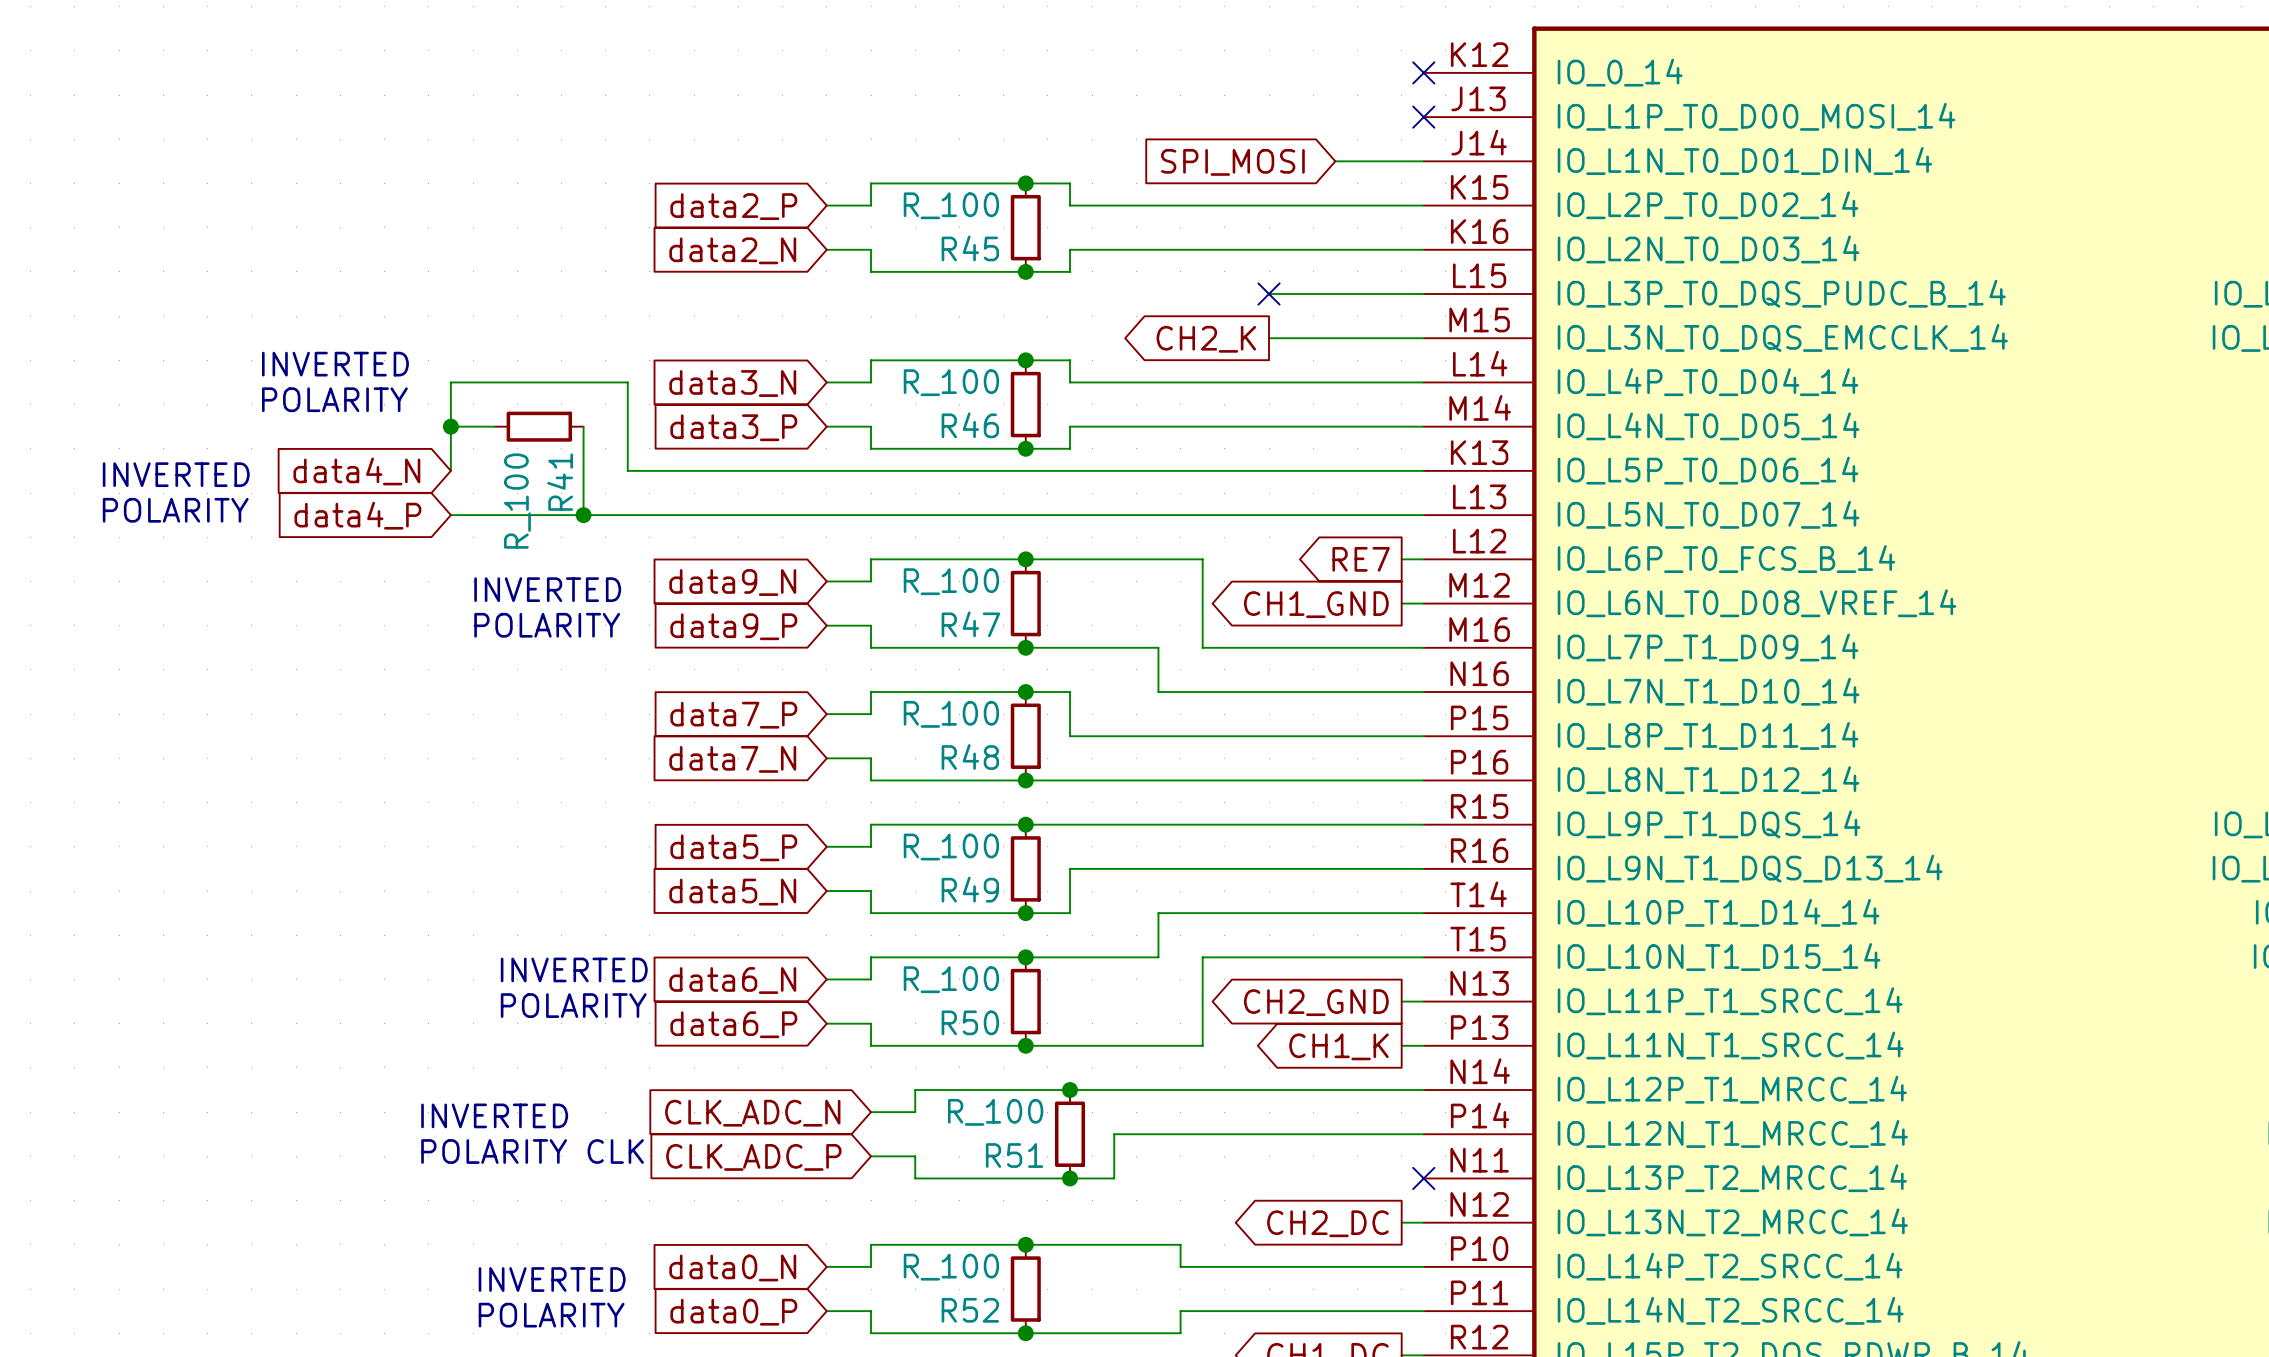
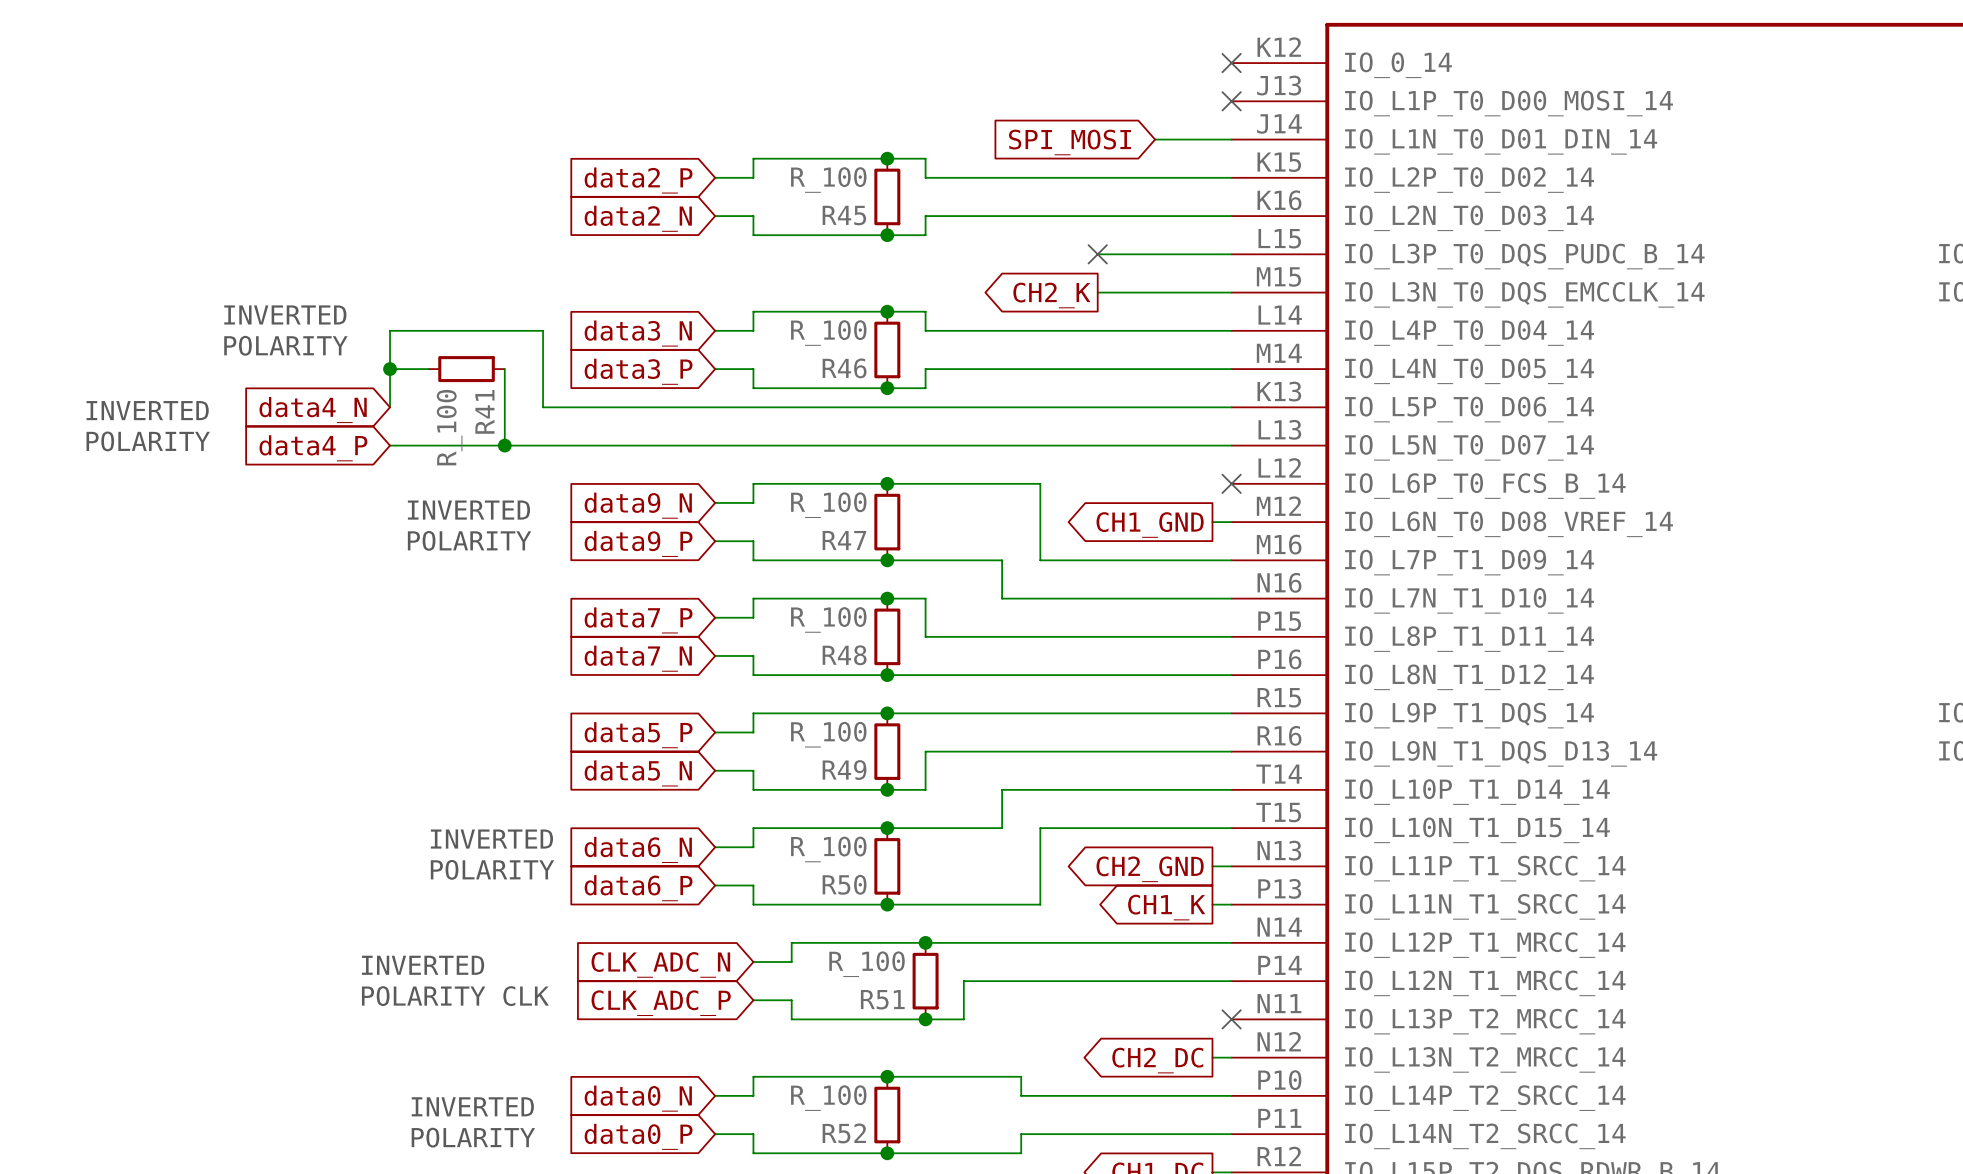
global label: RE7 (1361, 559) -> none
wire: (1401, 559) (1423, 559) -> none
no-connect mark: none -> (1231, 483)

